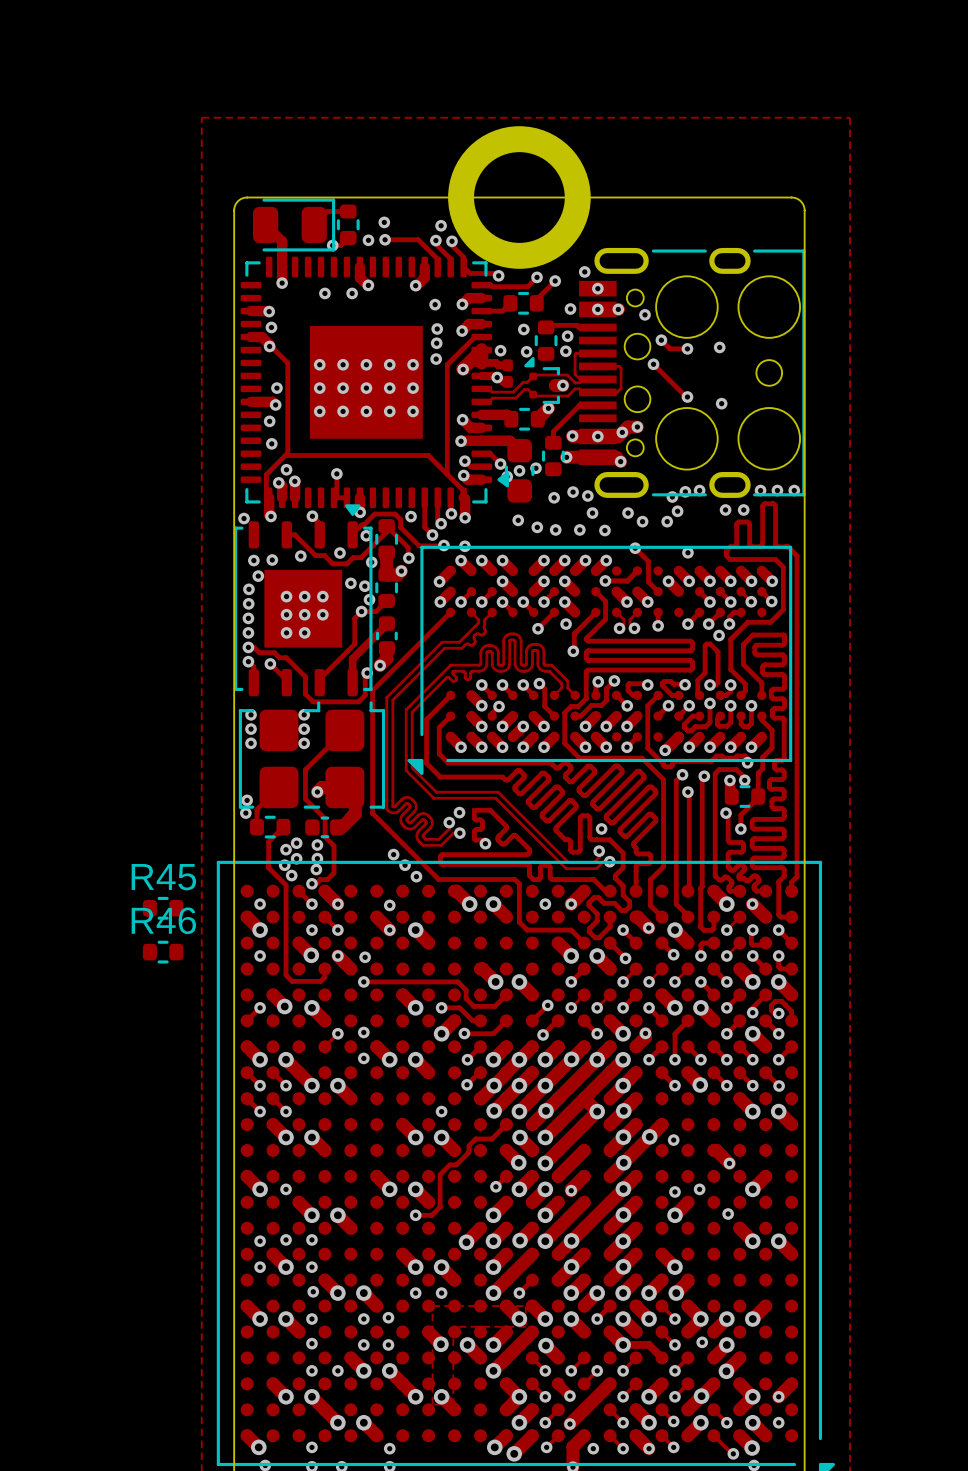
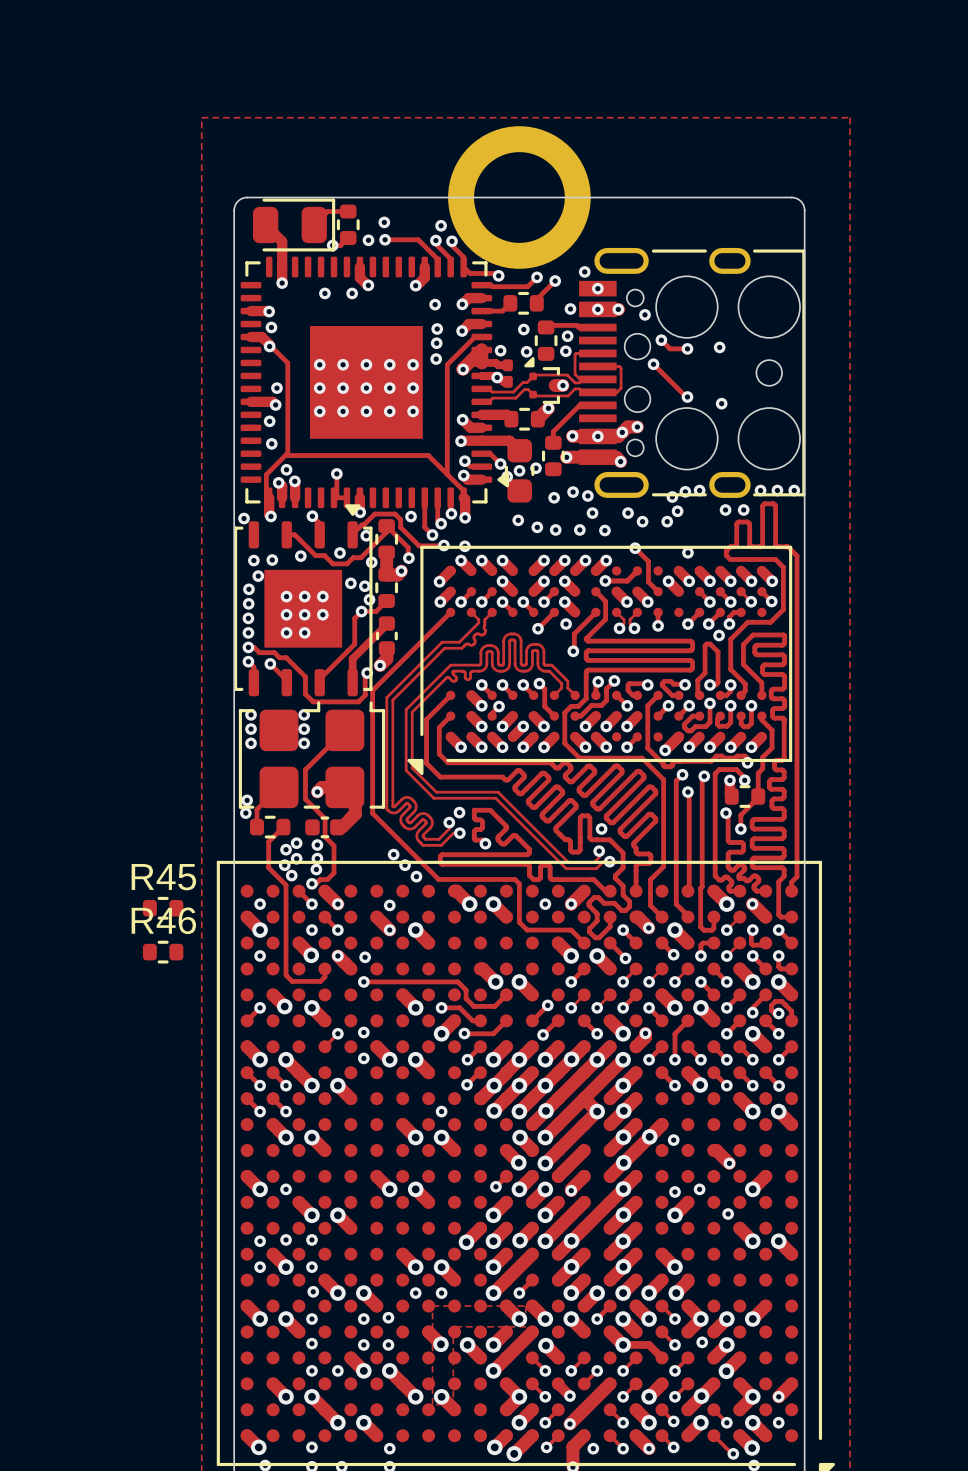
track: (506, 1124) (492, 1138) (475, 1138) (469, 1145) (469, 1152) (456, 1164) (449, 1164) (440, 1174) (440, 1207) (431, 1215) (415, 1215) -> none
via: (415, 1215) -> none

